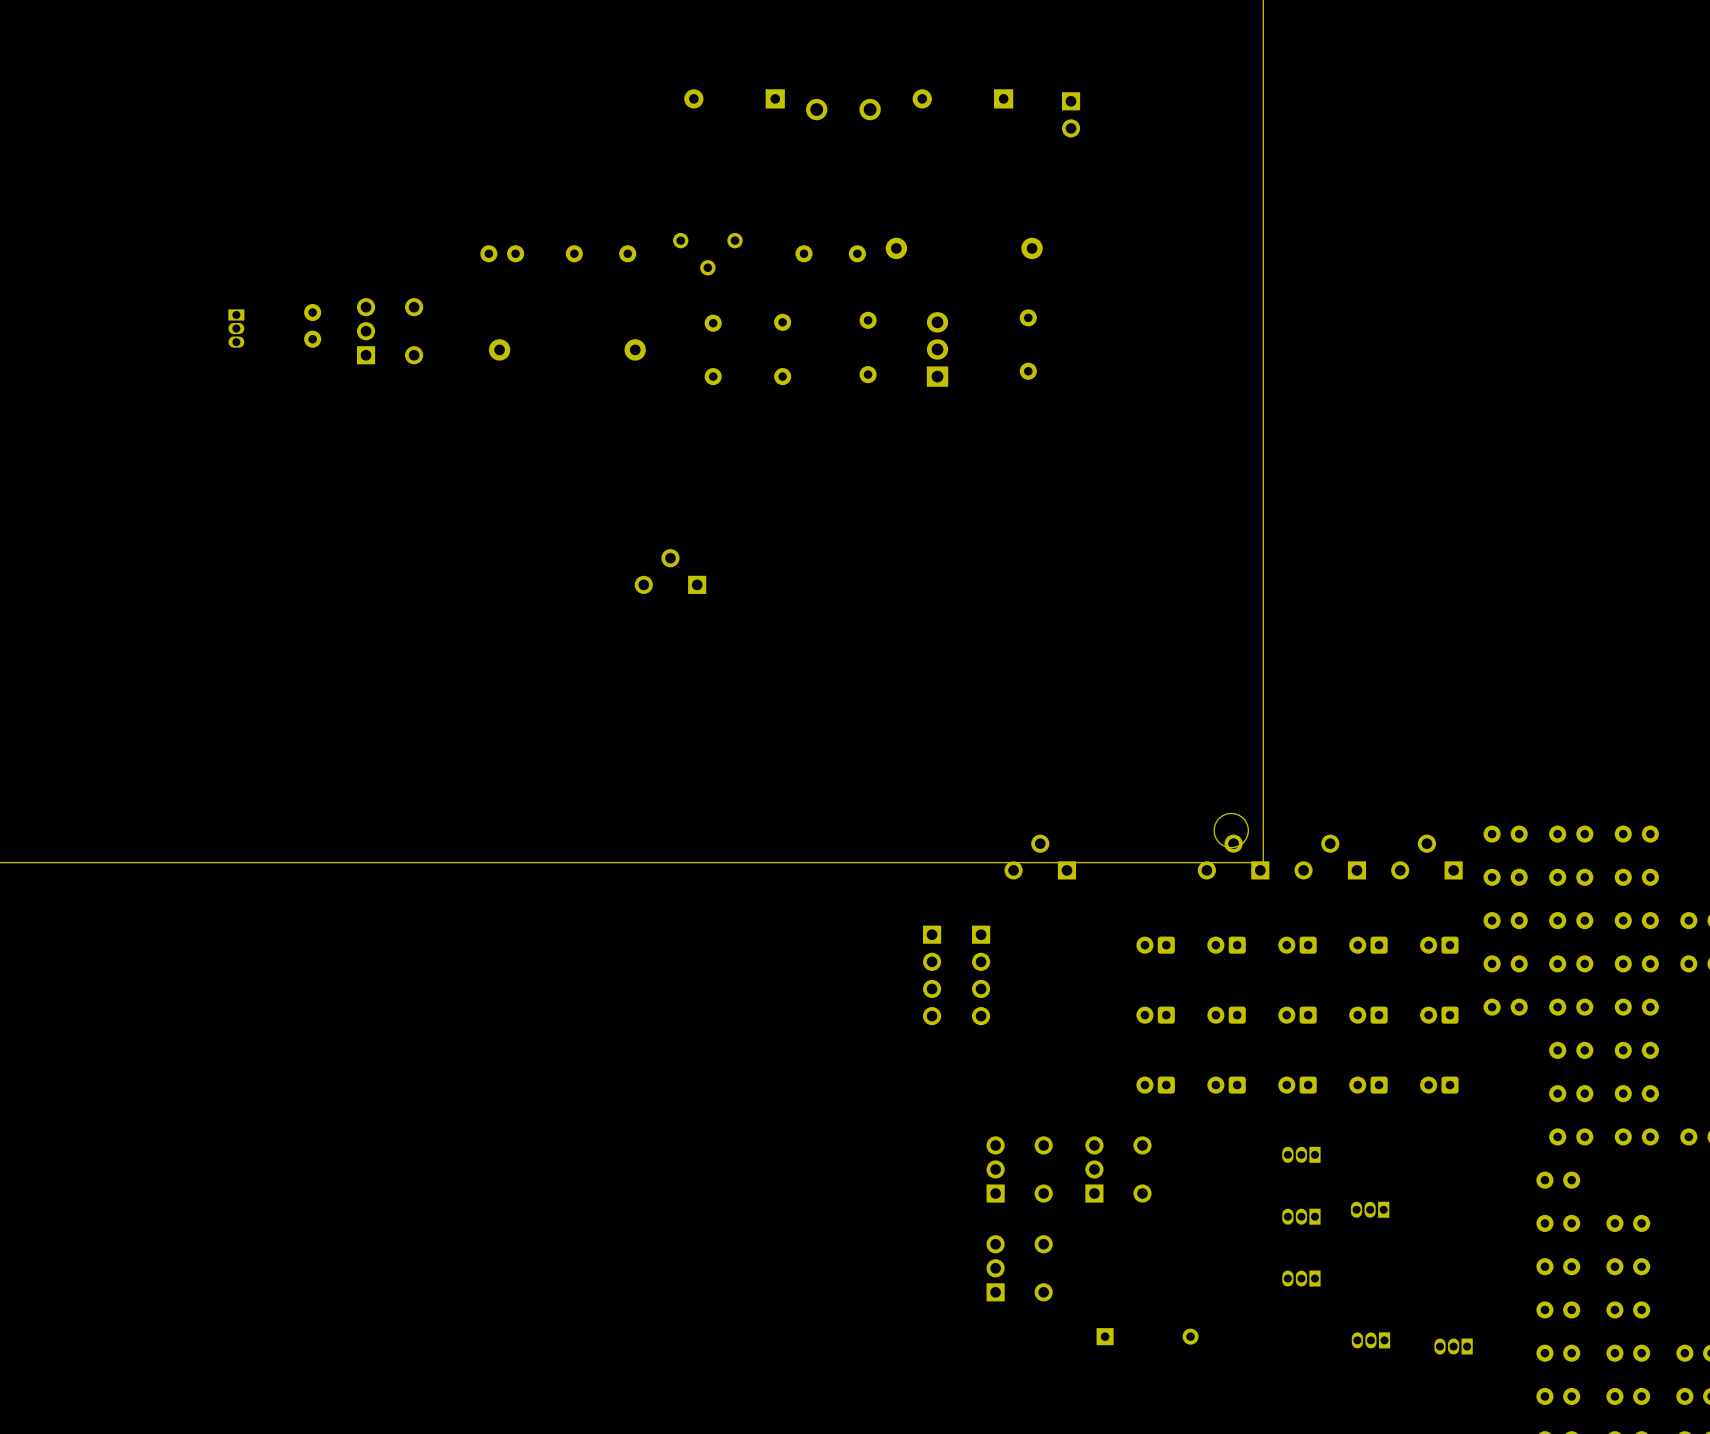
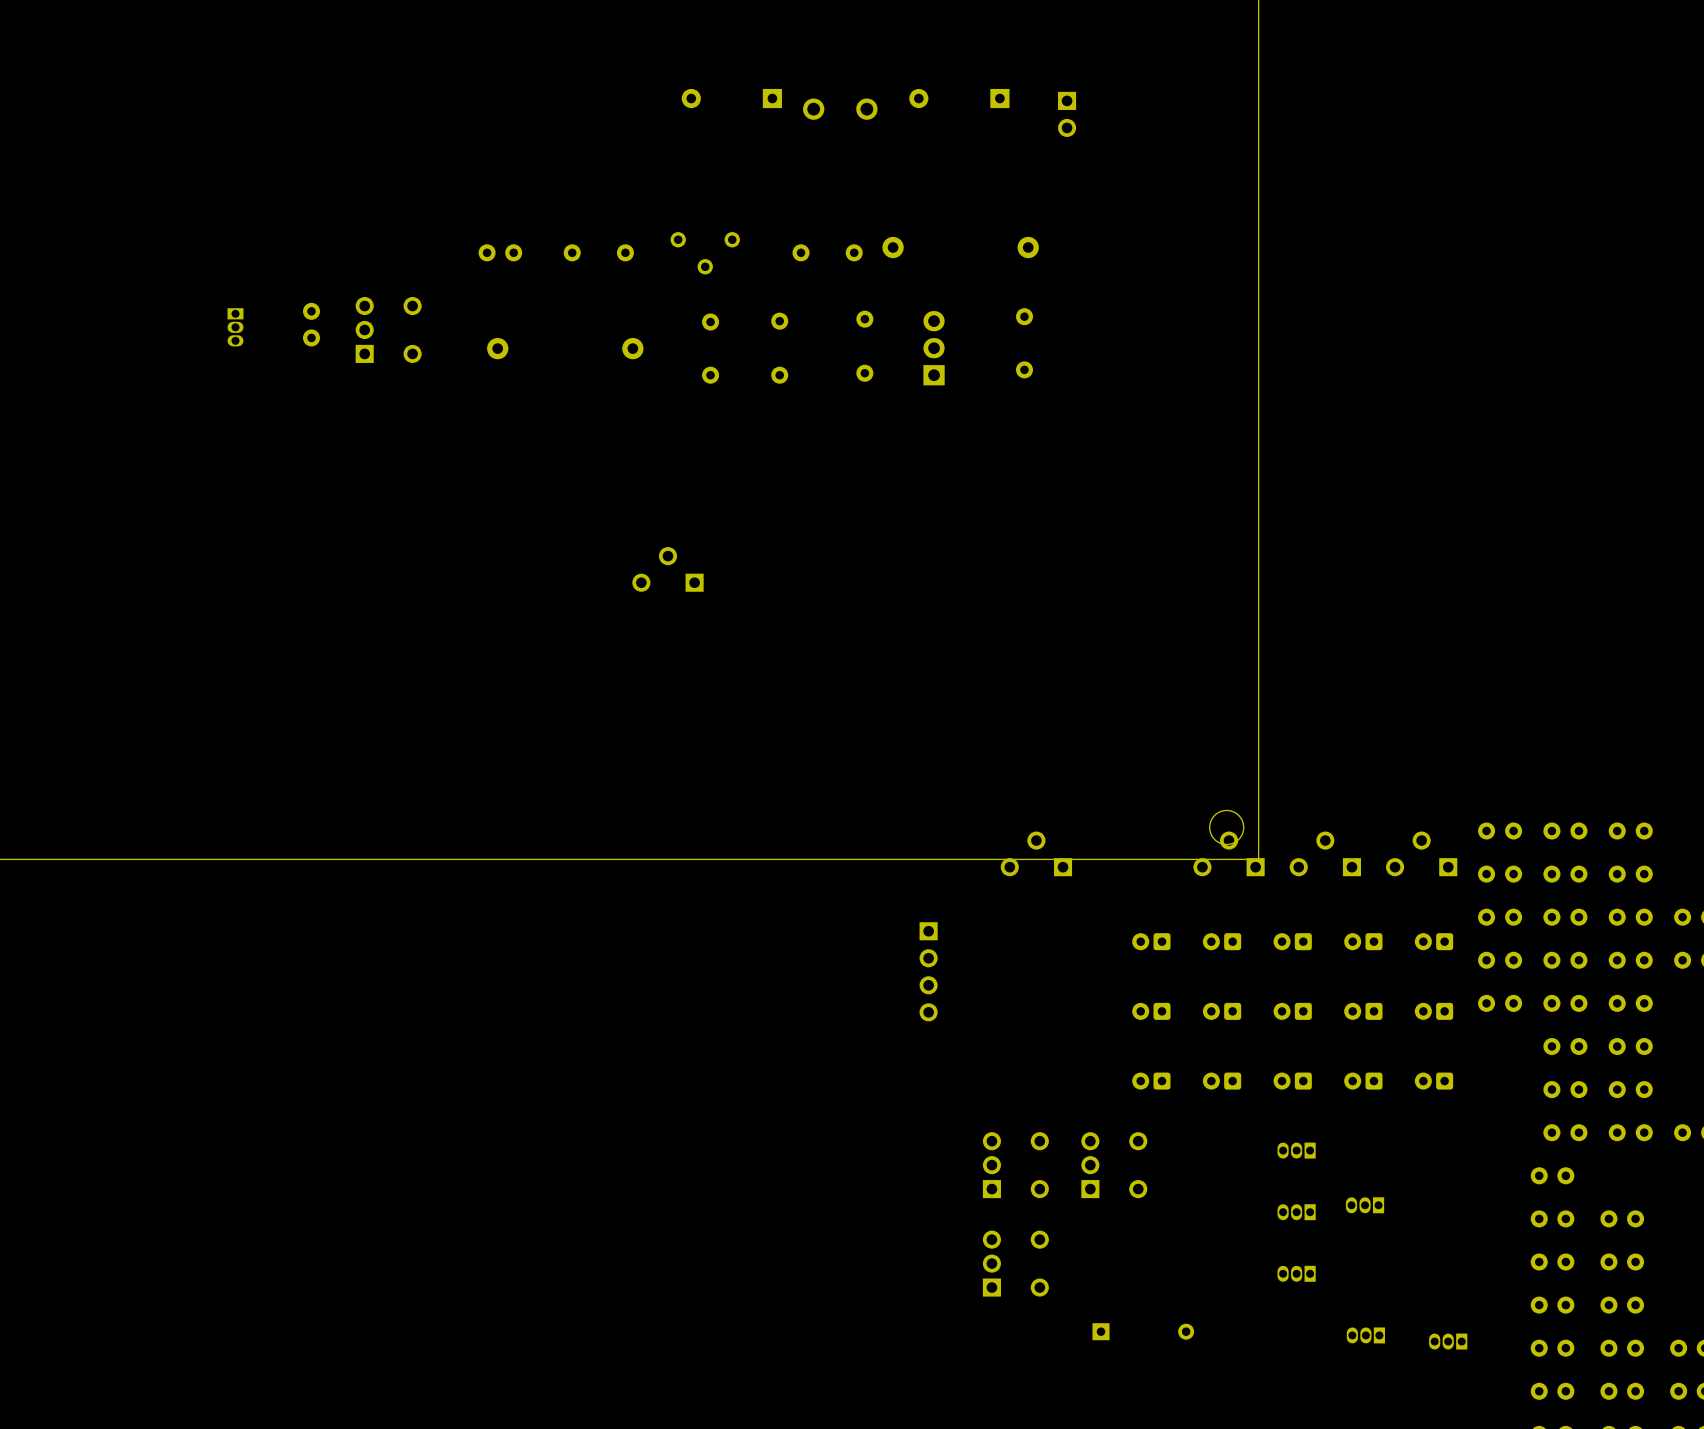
part: (981, 975) -> none

